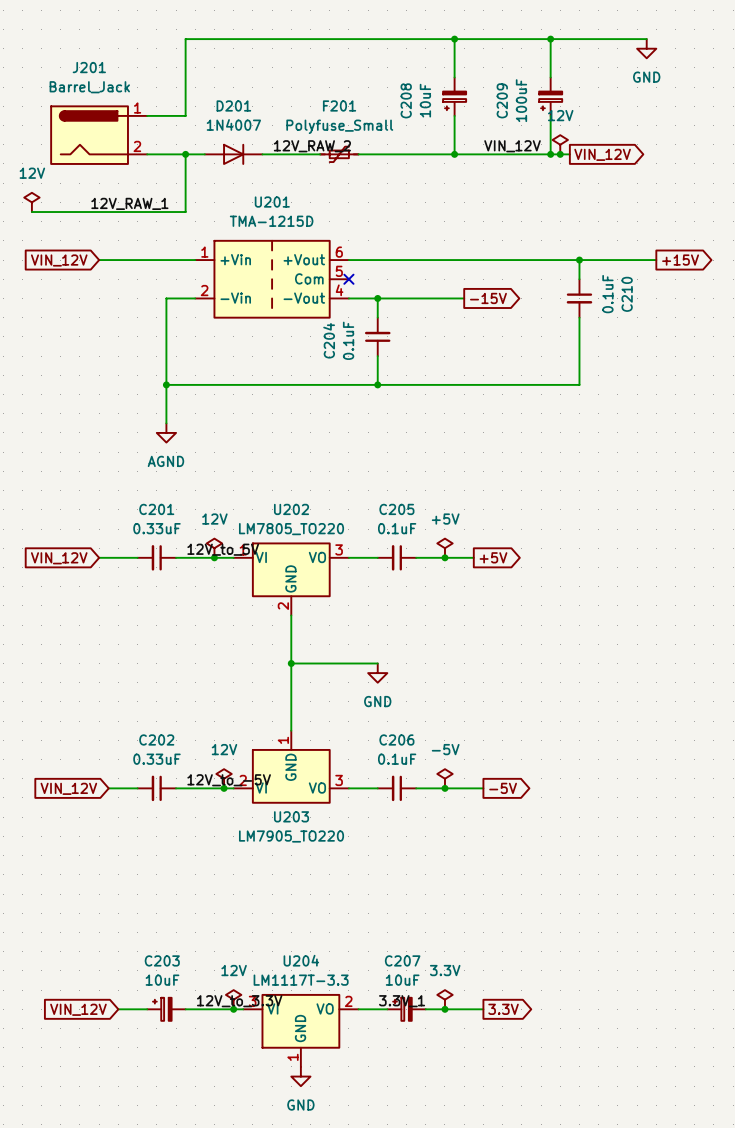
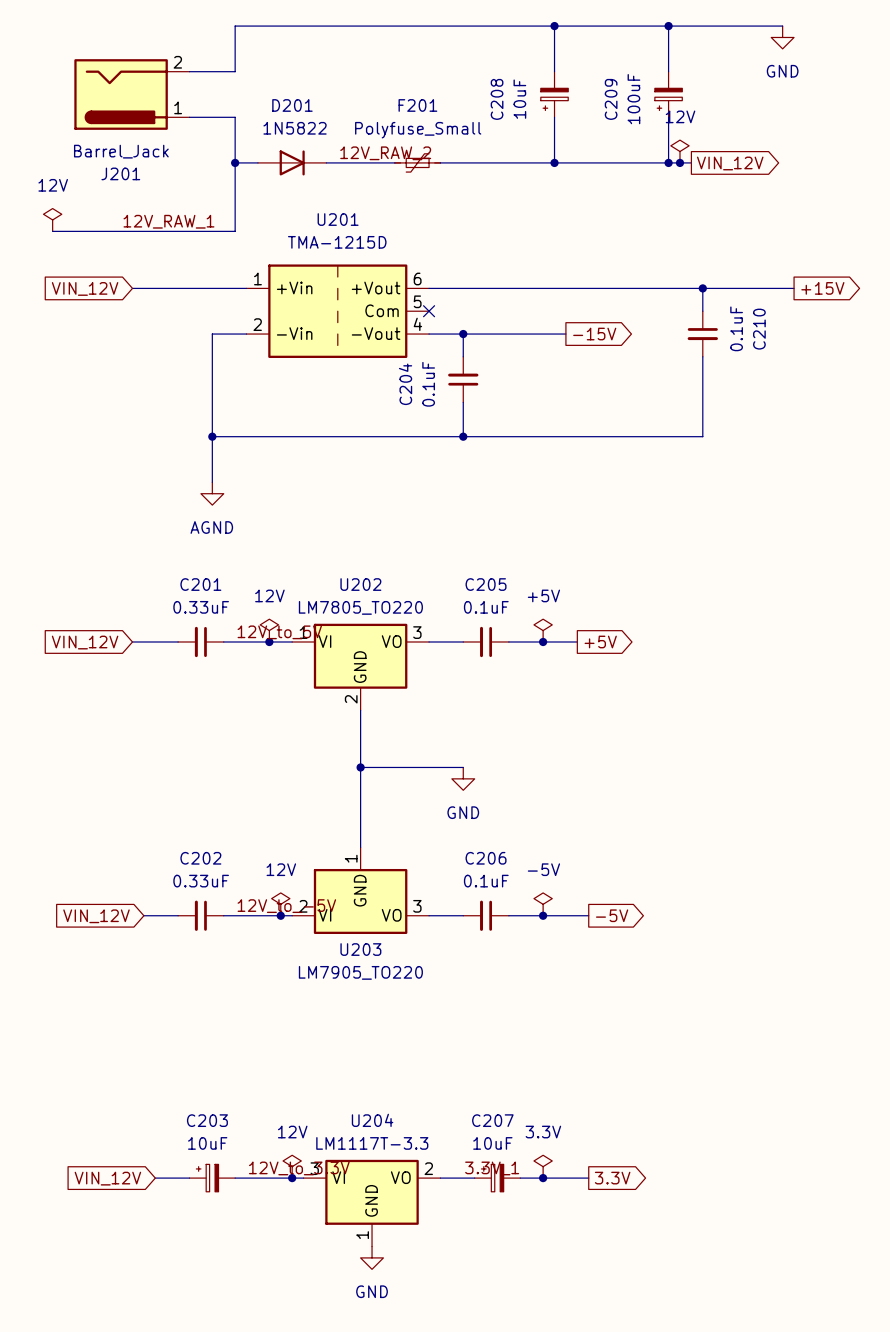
wire: (185, 77) (185, 115) -> (235, 71) (189, 71)
D201 value: 1N4007 (233, 124) -> 1N5822 (295, 128)
J201 flip: as is (89, 135) -> up-down (121, 94)
label: VIN_12V (512, 146) -> none
wire: (147, 154) (185, 154) -> (235, 117) (235, 162)

